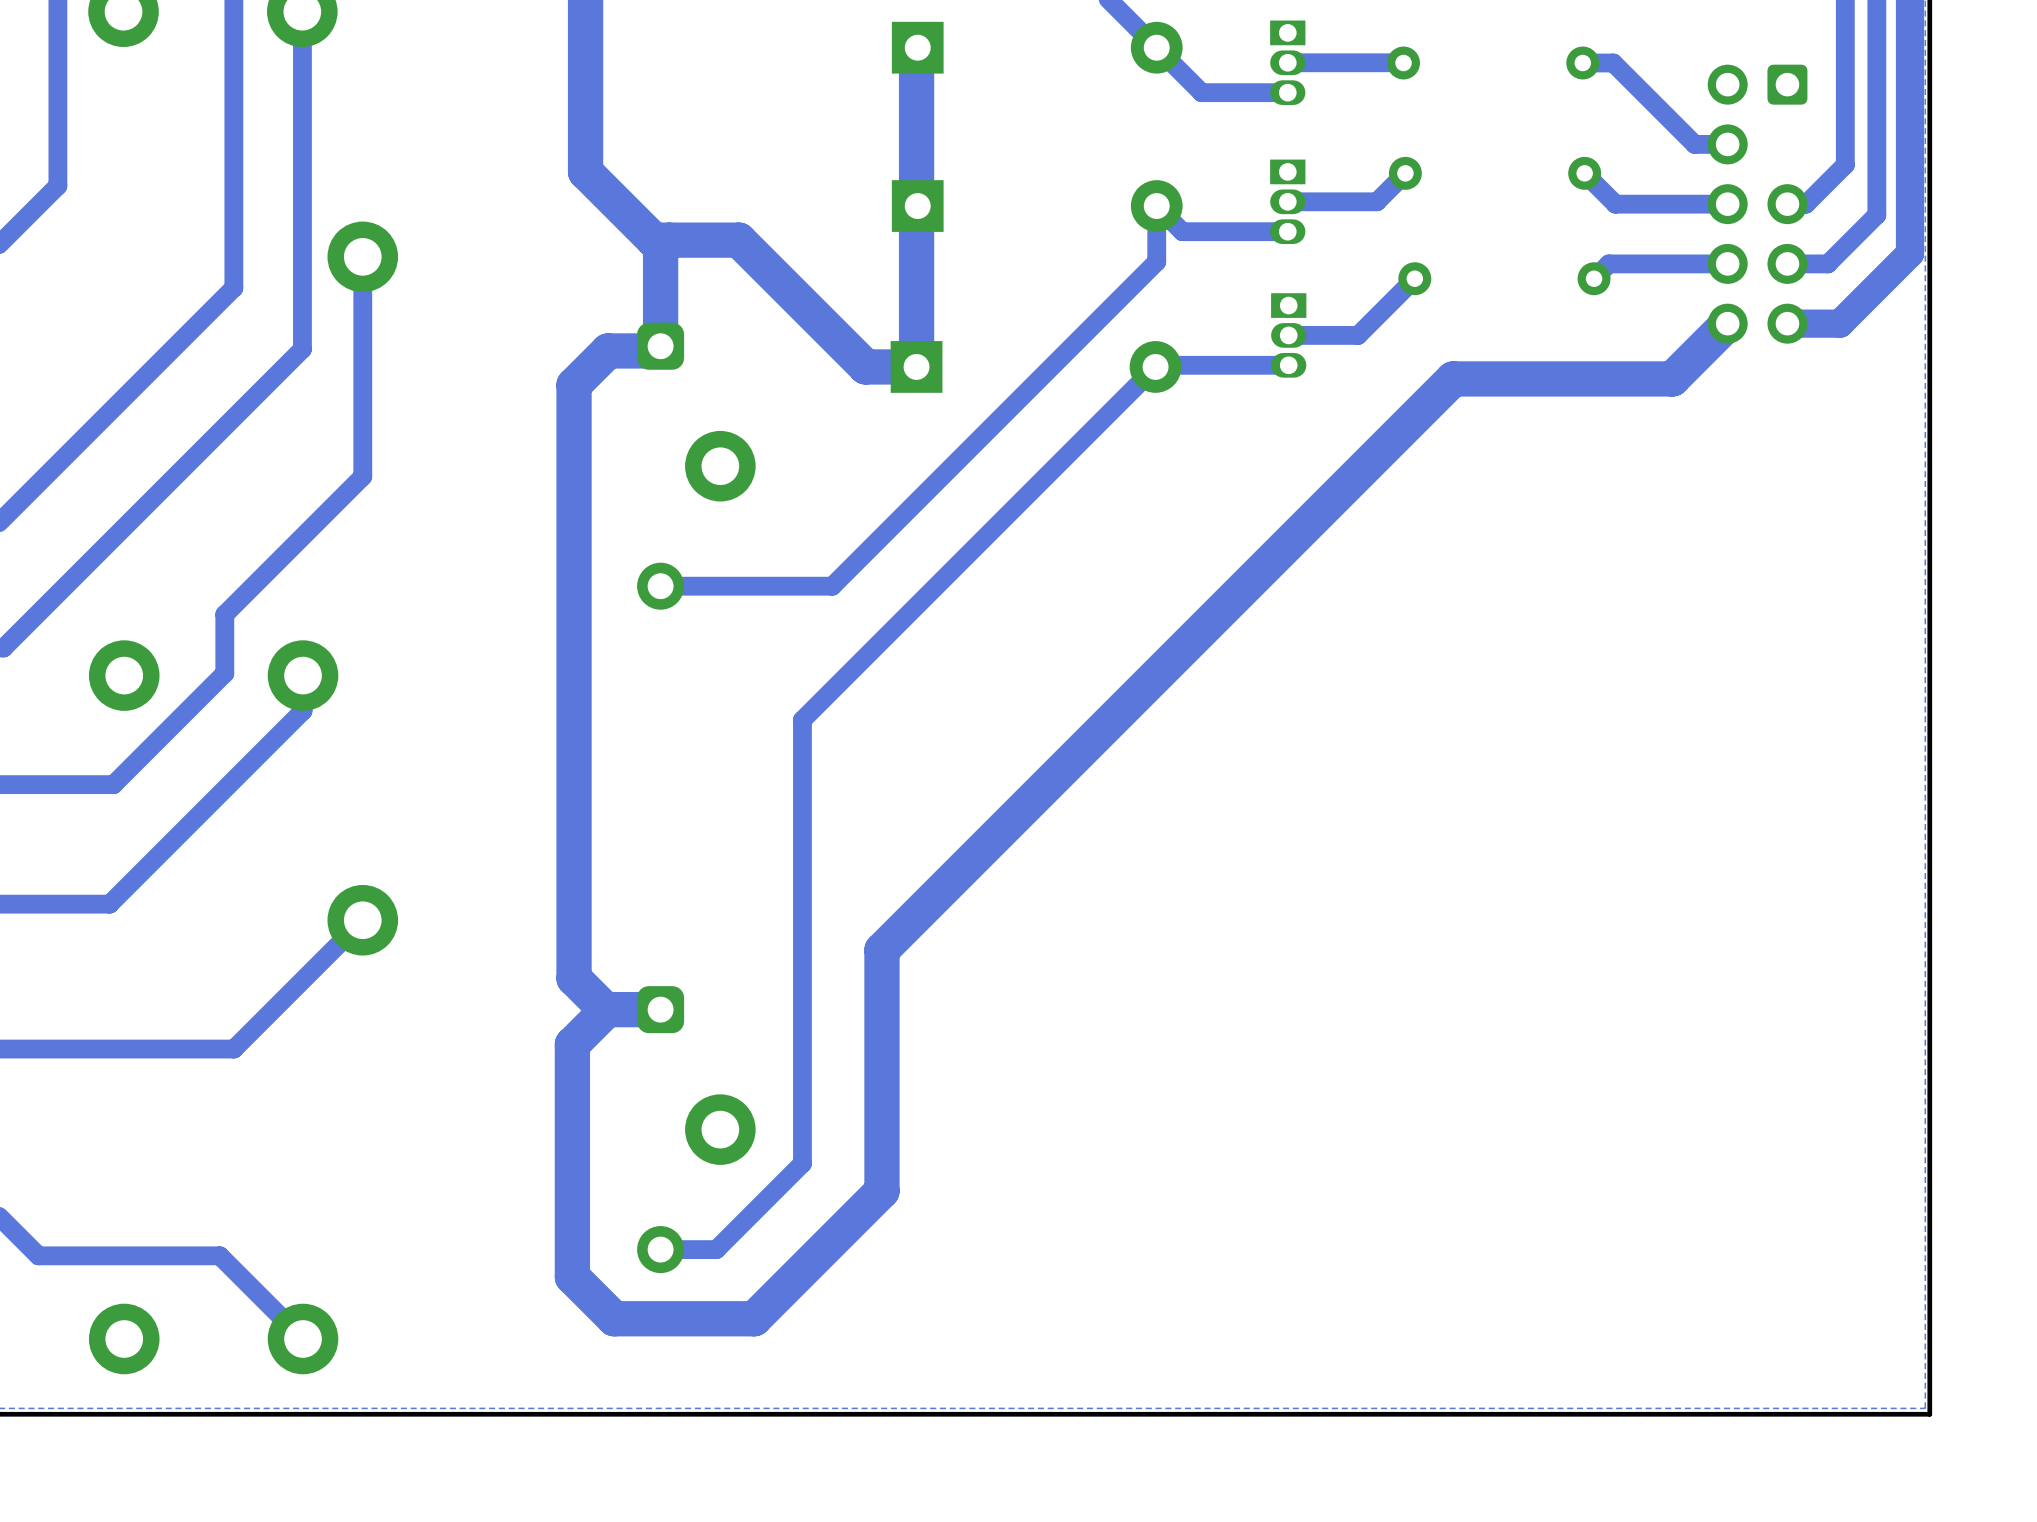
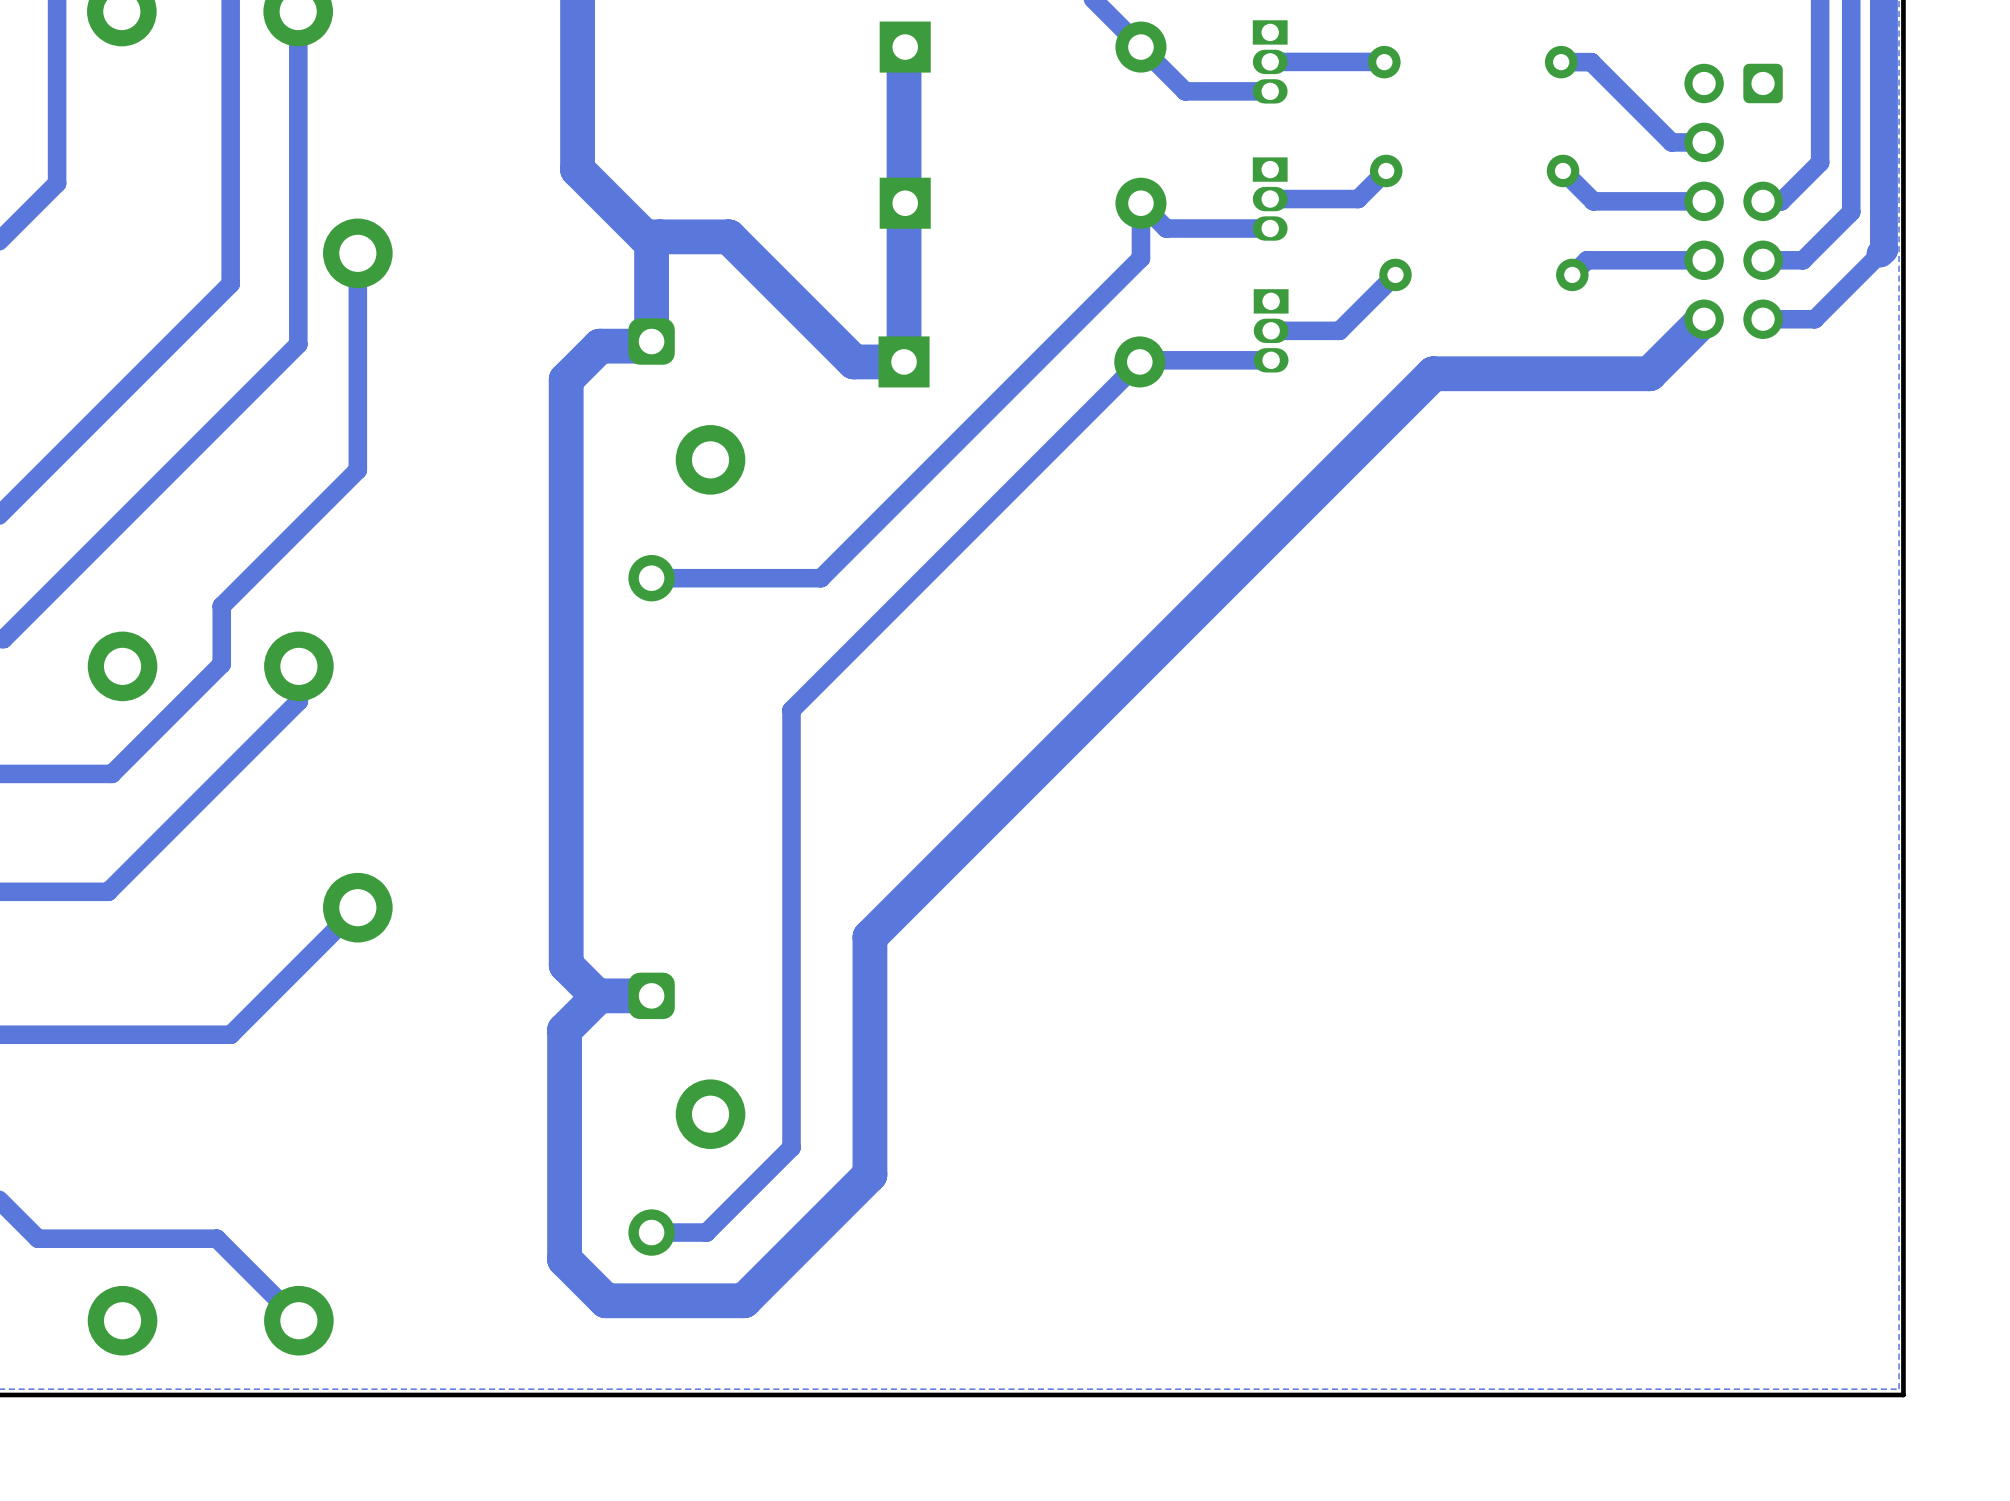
track width: thick (1906, 257) (1839, 323) (1787, 323) -> thin (1880, 253) (1814, 319) (1763, 319)

